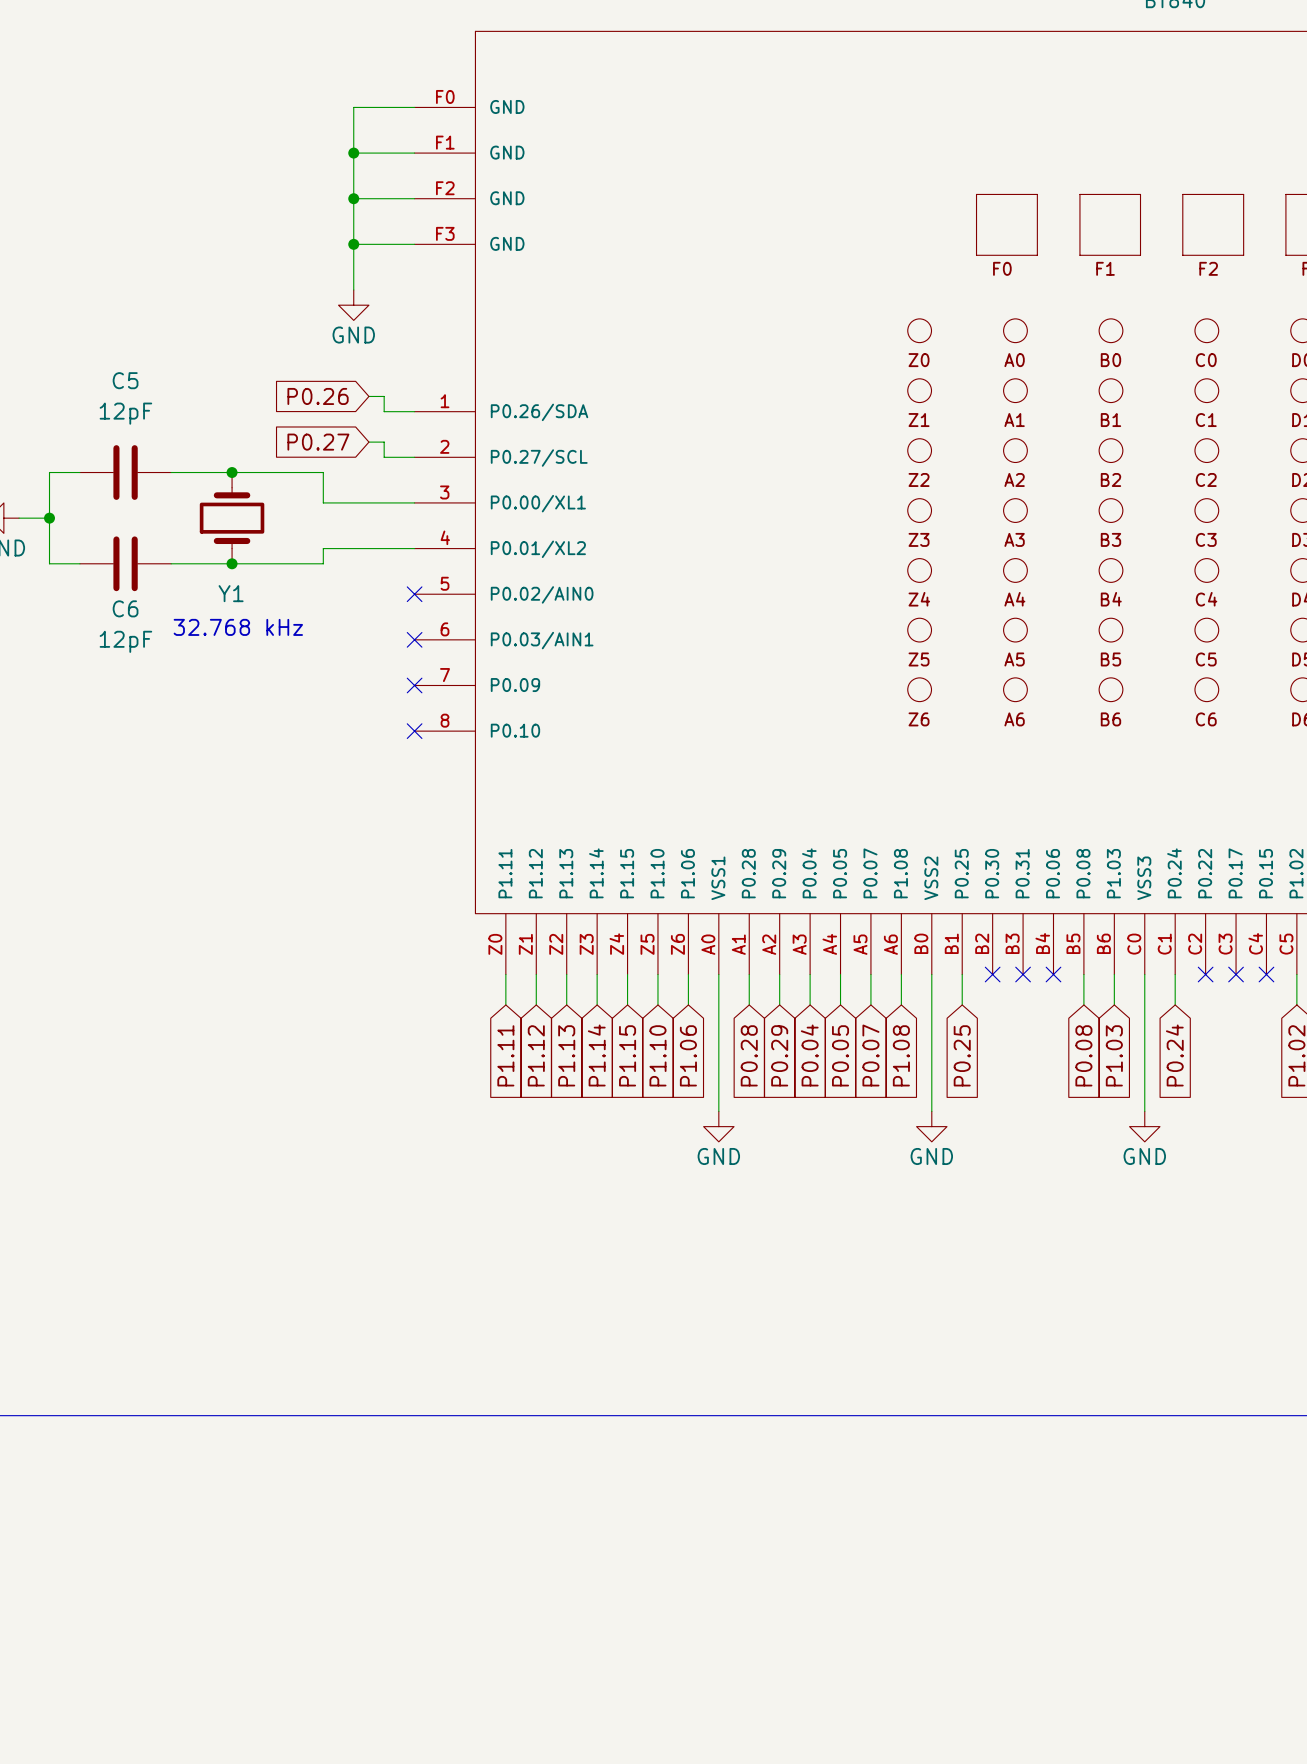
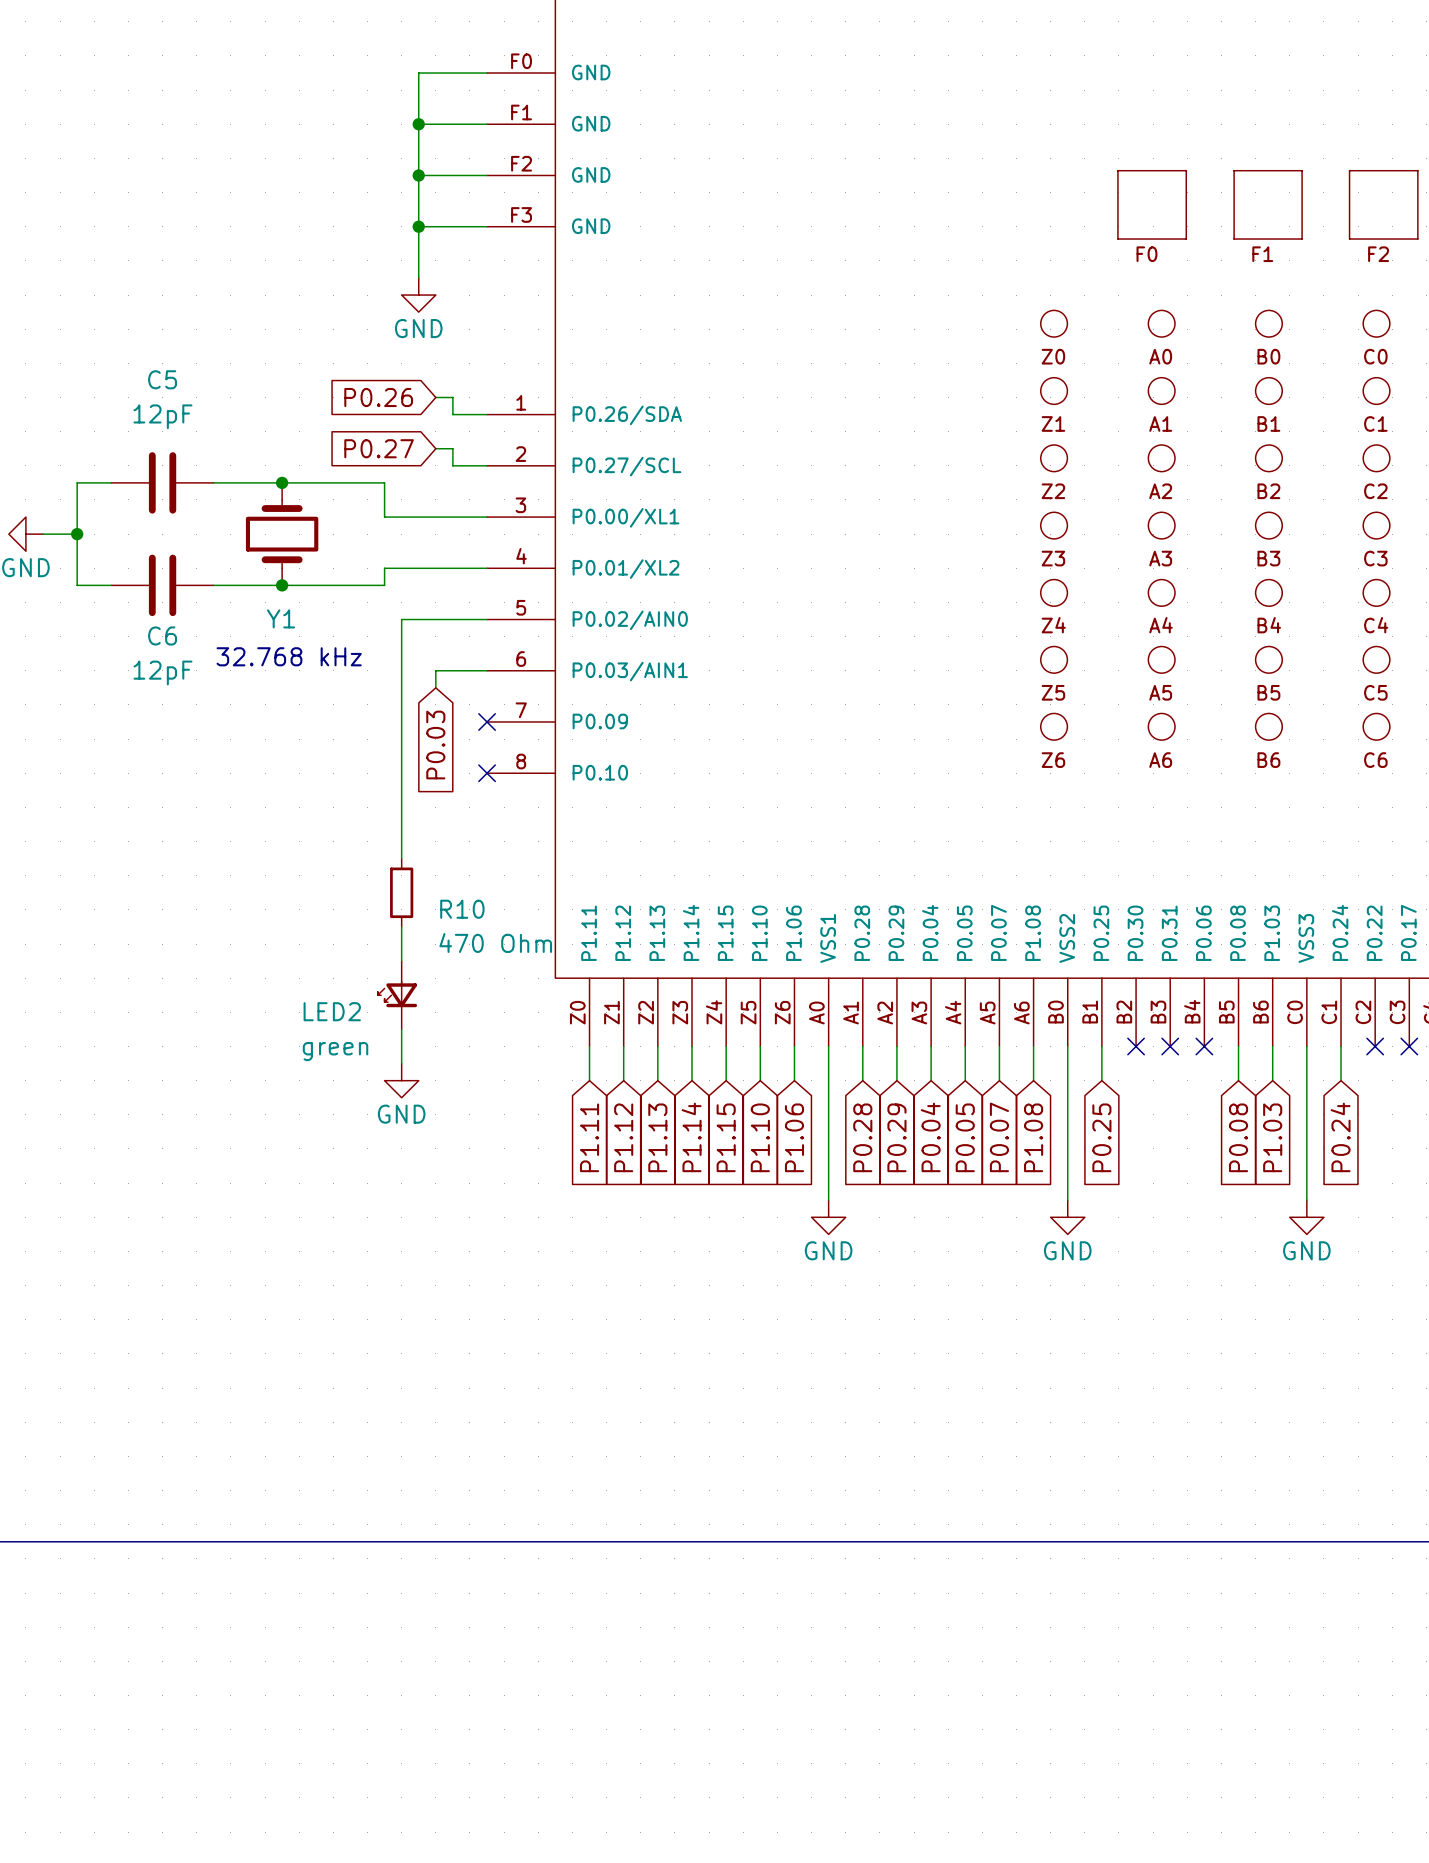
wire: none -> (487, 619) (401, 619) (401, 858)
no-connect mark: (414, 594) -> none
wire: none -> (487, 670) (435, 670) (435, 687)
no-connect mark: (414, 639) -> none
global label: none -> P0.03 (435, 745)
R10: none -> 470 Ohm (401, 892)
wire: none -> (401, 926) (401, 961)
LED2: none -> green (397, 995)
wire: none -> (401, 1029) (401, 1063)
power symbol: none -> GND (401, 1080)

